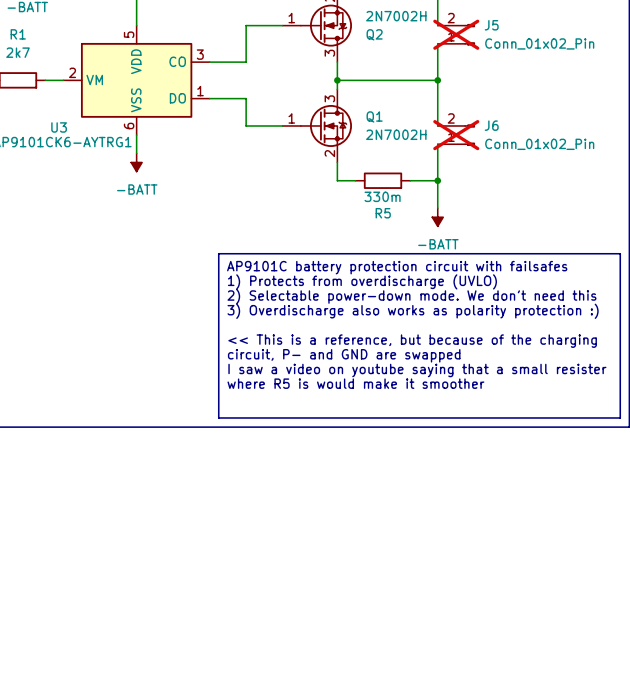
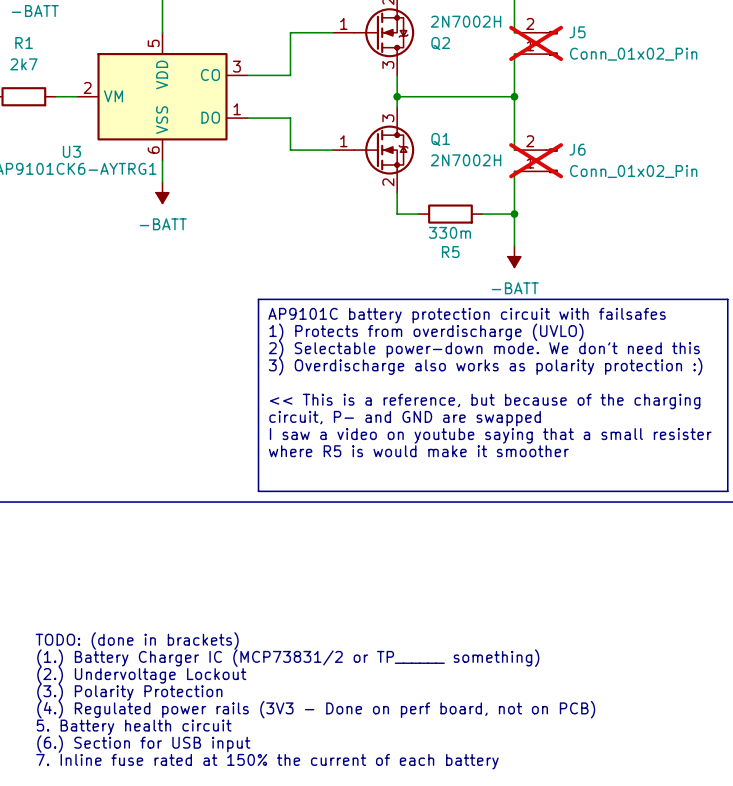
text: none -> TODO: (done in brackets) (137, 640)
text: none -> (1.) Battery Charger IC (MCP73831/2 or TP______ something) (288, 658)
text: none -> (2.) Undervoltage Lockout (141, 675)
text: none -> (3.) Polarity Protection (129, 692)
text: none -> (4.) Regulated power rails (3V3 - Done on perf board, not on PCB) (316, 709)
text: none -> 5. Battery health circuit (134, 727)
text: none -> (6.) Section for USB input (143, 744)
text: none -> 7. Inline fuse rated at 150% the current of each battery (267, 761)

